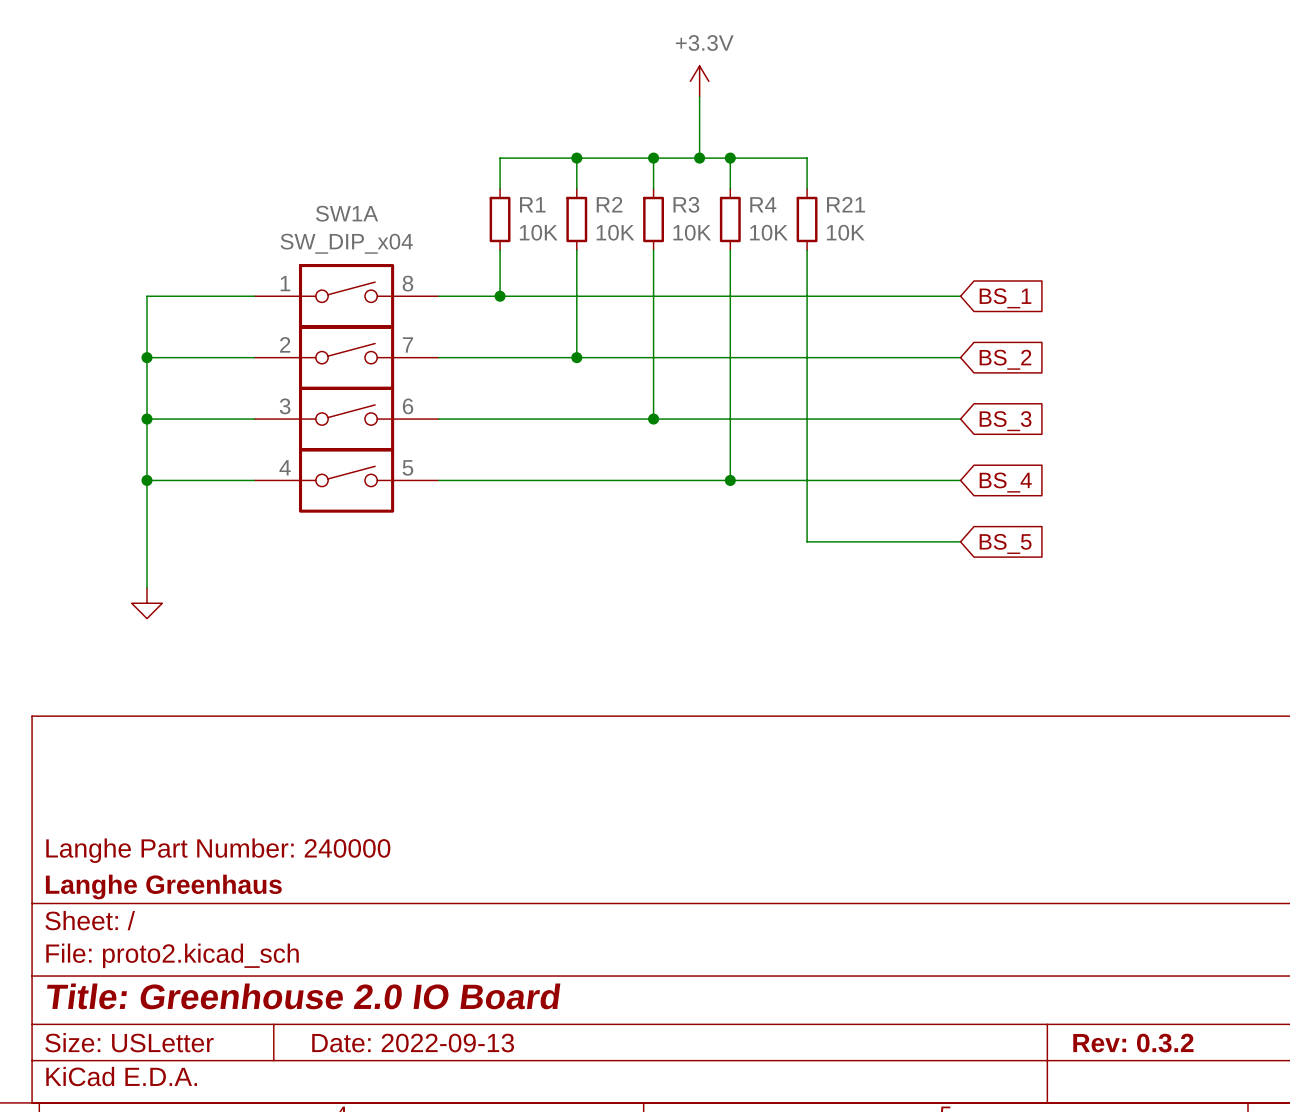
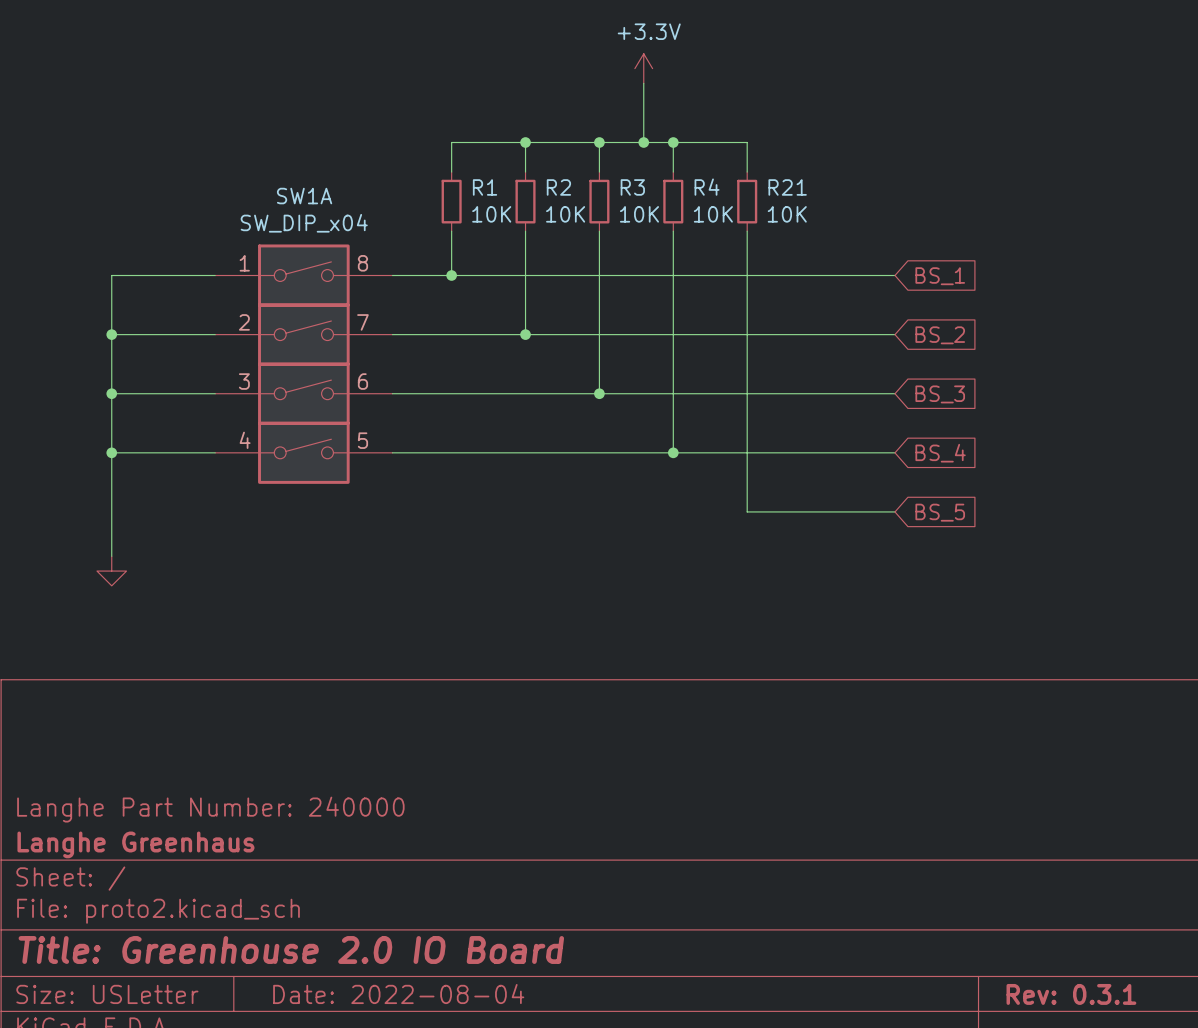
title block: Date: 2022-09-13 (413, 1043) -> Date: 2022-08-04 (398, 994)
title block: Rev: 0.3.2 (1133, 1043) -> Rev: 0.3.1 (1071, 994)

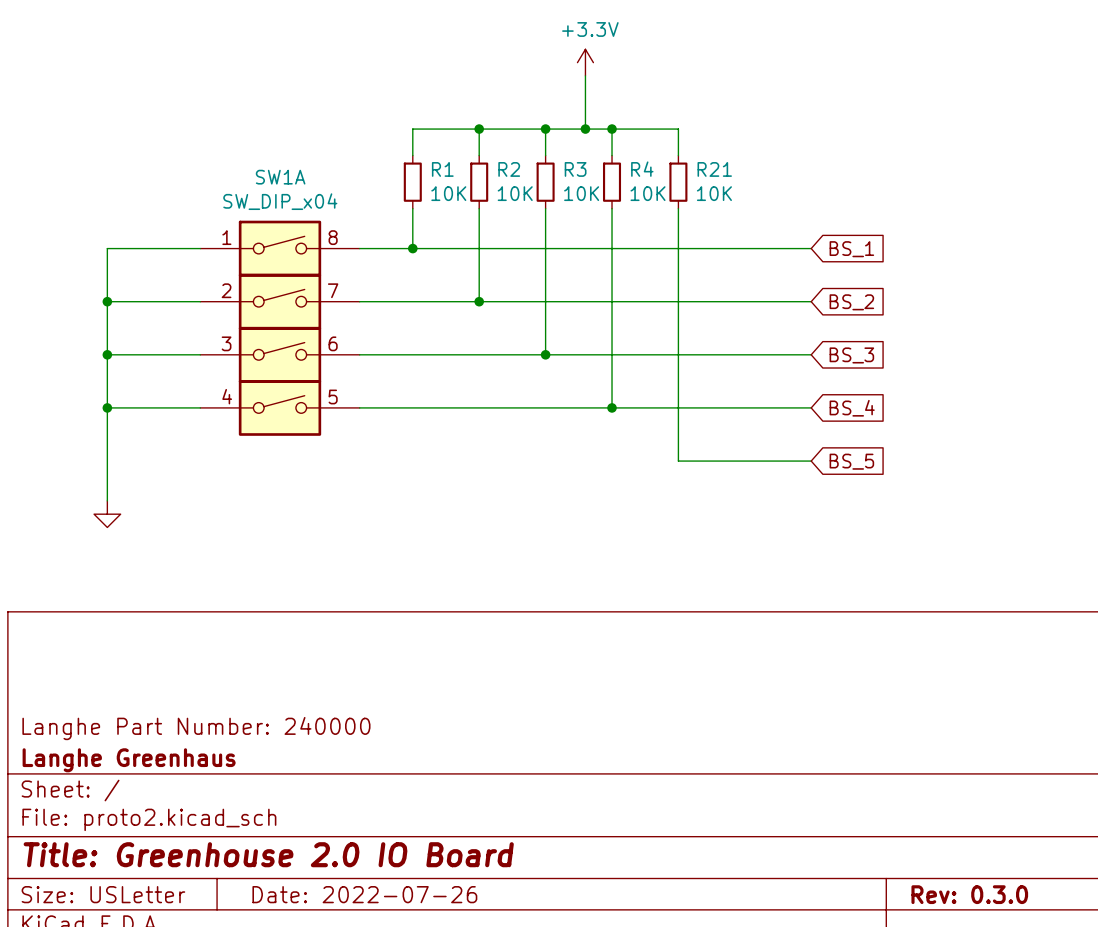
title block: Date: 2022-08-04 (398, 994) -> Date: 2022-07-26 (364, 894)
title block: Rev: 0.3.1 (1071, 994) -> Rev: 0.3.0 (969, 894)

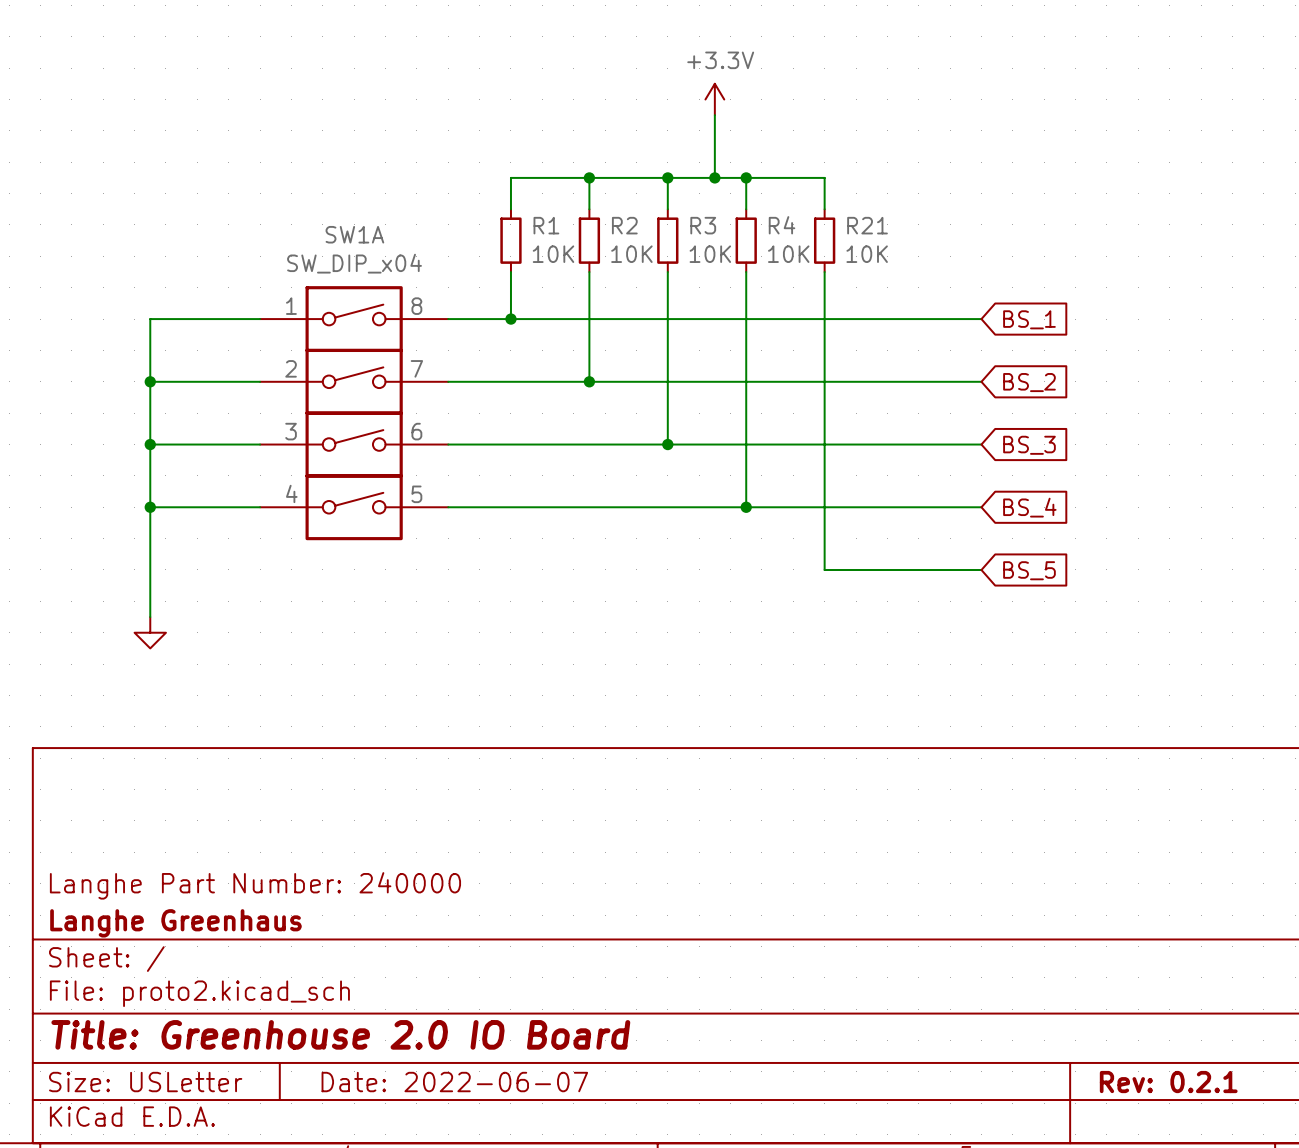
title block: Date: 2022-07-26 (364, 894) -> Date: 2022-06-07 (454, 1082)
title block: Rev: 0.3.0 (969, 894) -> Rev: 0.2.1 (1168, 1082)

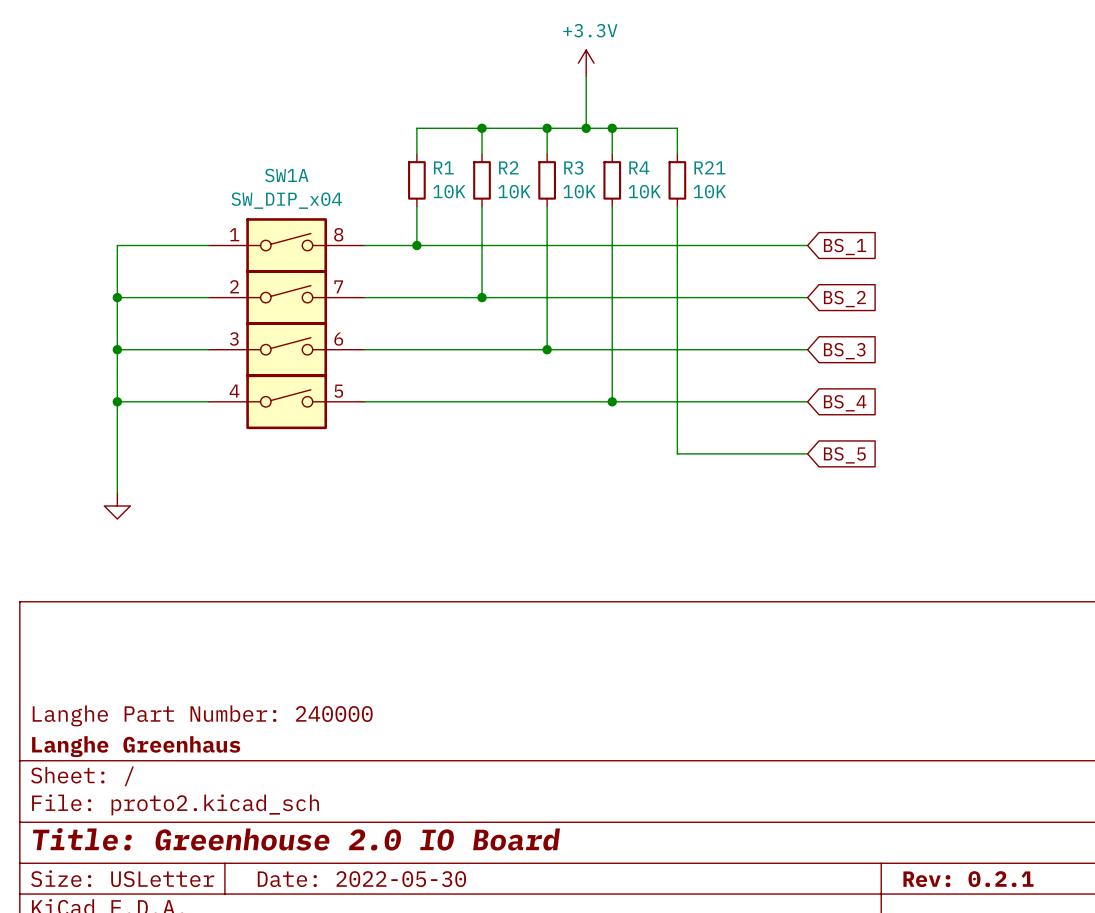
title block: Date: 2022-06-07 (454, 1082) -> Date: 2022-05-30 (361, 879)

